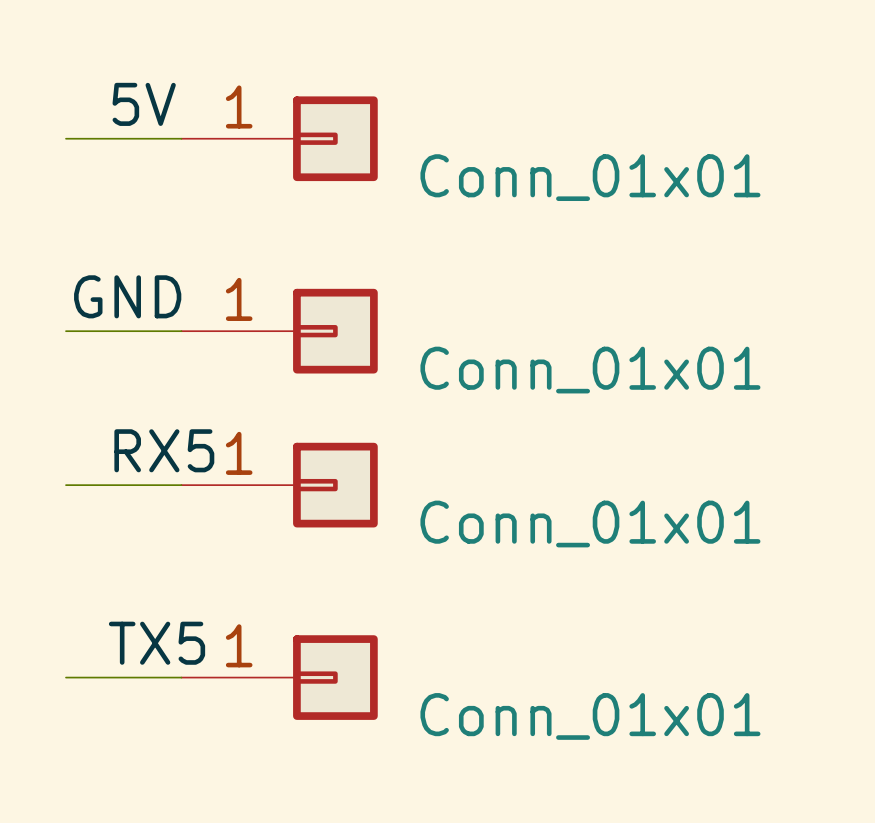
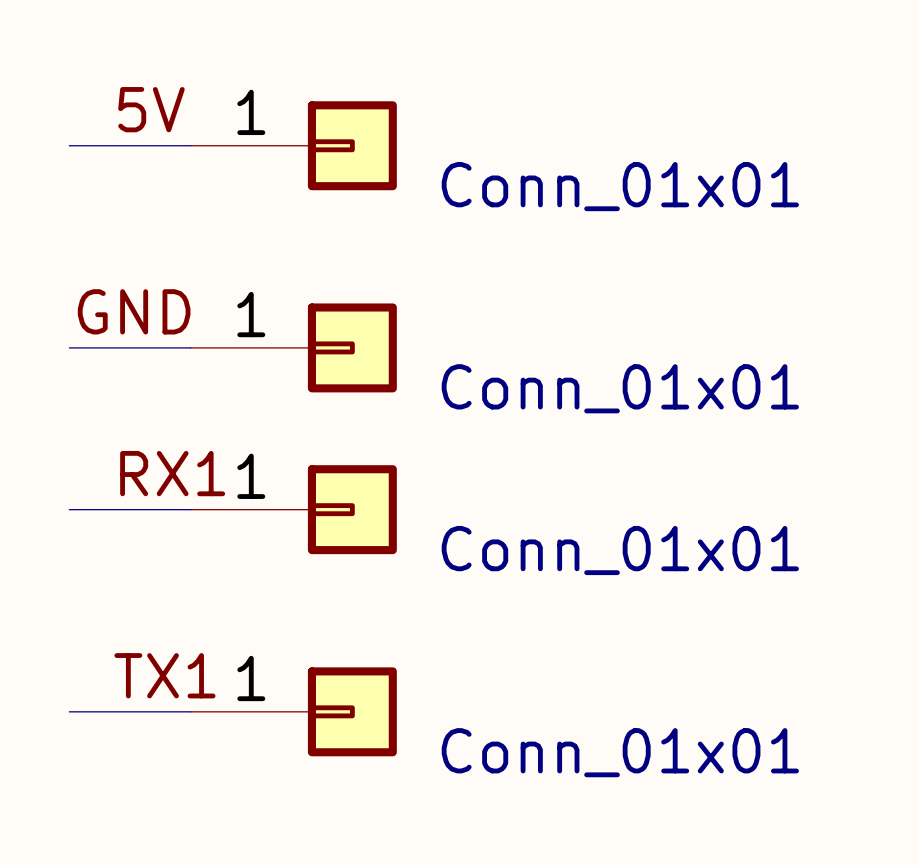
label: RX5 (164, 450) -> RX1 (172, 473)
label: TX5 (157, 643) -> TX1 (164, 675)

